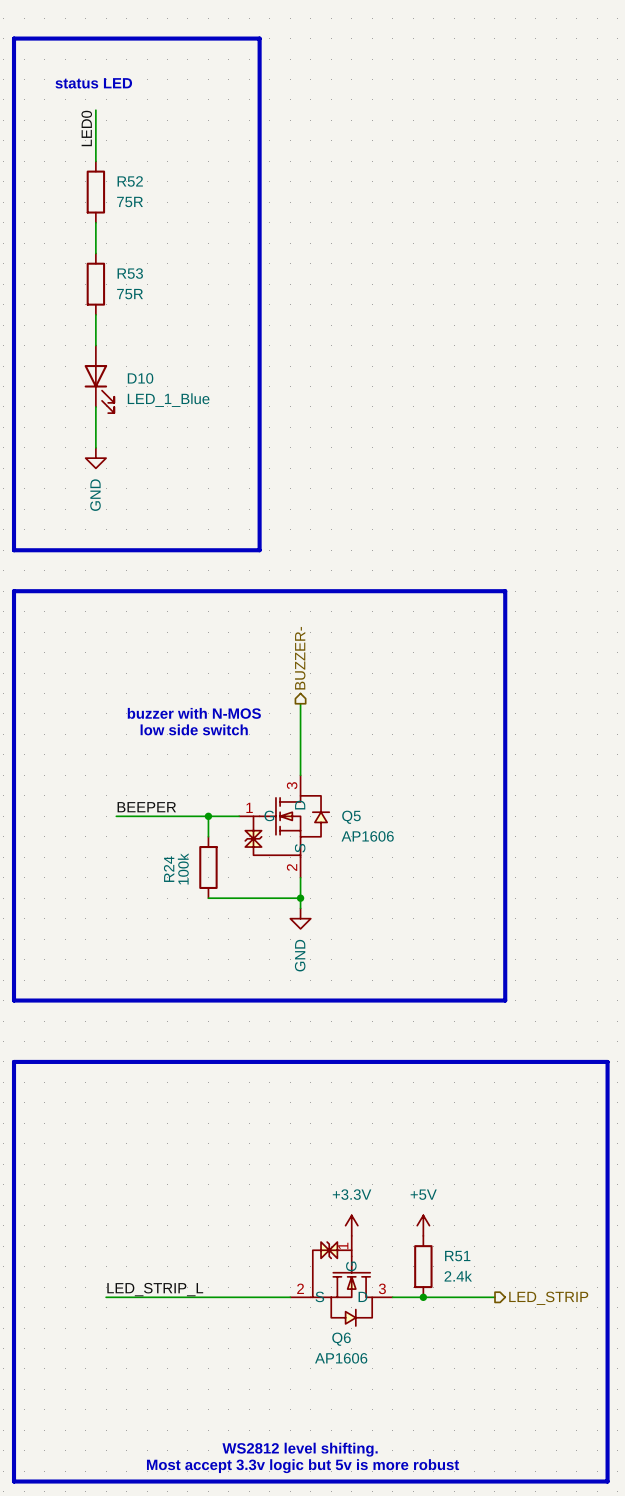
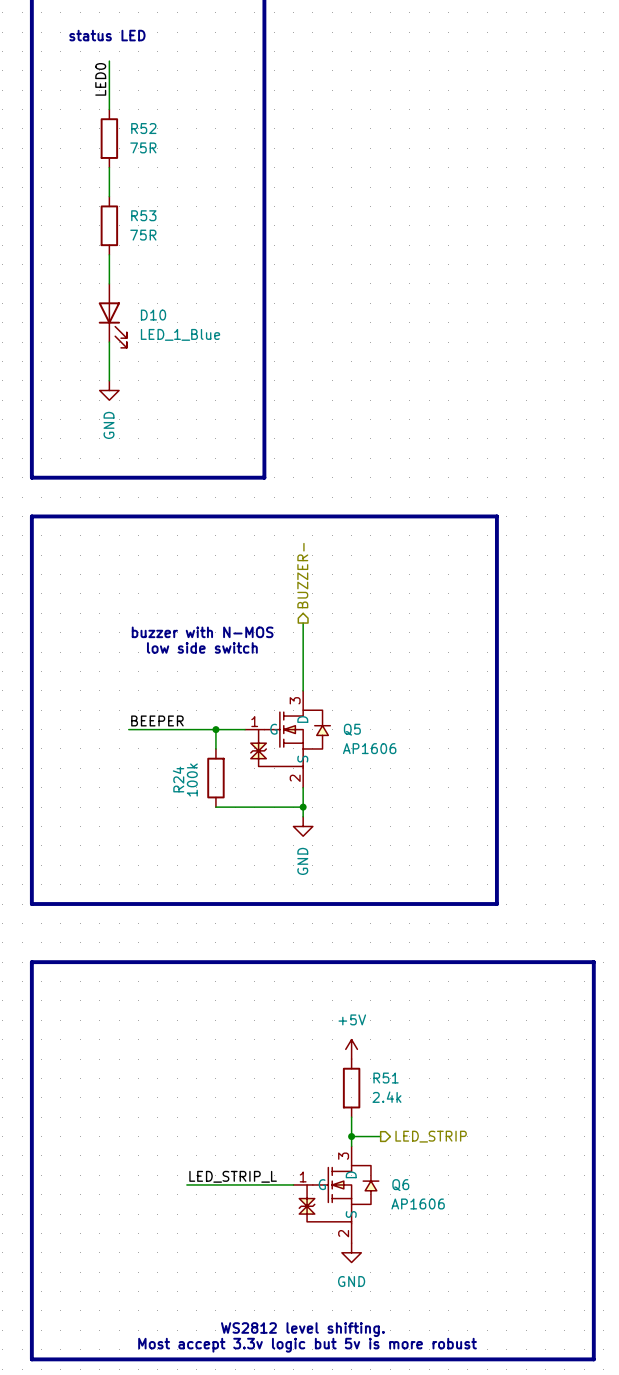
power symbol: +3.3V (351, 1225) -> none
power symbol position: +5V (423, 1225) -> +5V (351, 1049)
wire: none -> (351, 1136) (380, 1136)
junction: none -> (351, 1136)
R51 position: (423, 1266) -> (351, 1088)
Q6 rotation: 0° (341, 1284) -> 90° counterclockwise (339, 1194)
label position: LED_STRIP_L (155, 1289) -> LED_STRIP_L (233, 1176)
wire: (106, 1297) (177, 1297) -> none
wire: (392, 1297) (494, 1297) -> none
junction: (423, 1297) -> none
hierarchical label position: LED_STRIP (548, 1298) -> LED_STRIP (431, 1136)
Q6 name position: Q6 (341, 1339) -> Q6 (400, 1185)
power symbol: none -> GND (351, 1252)

